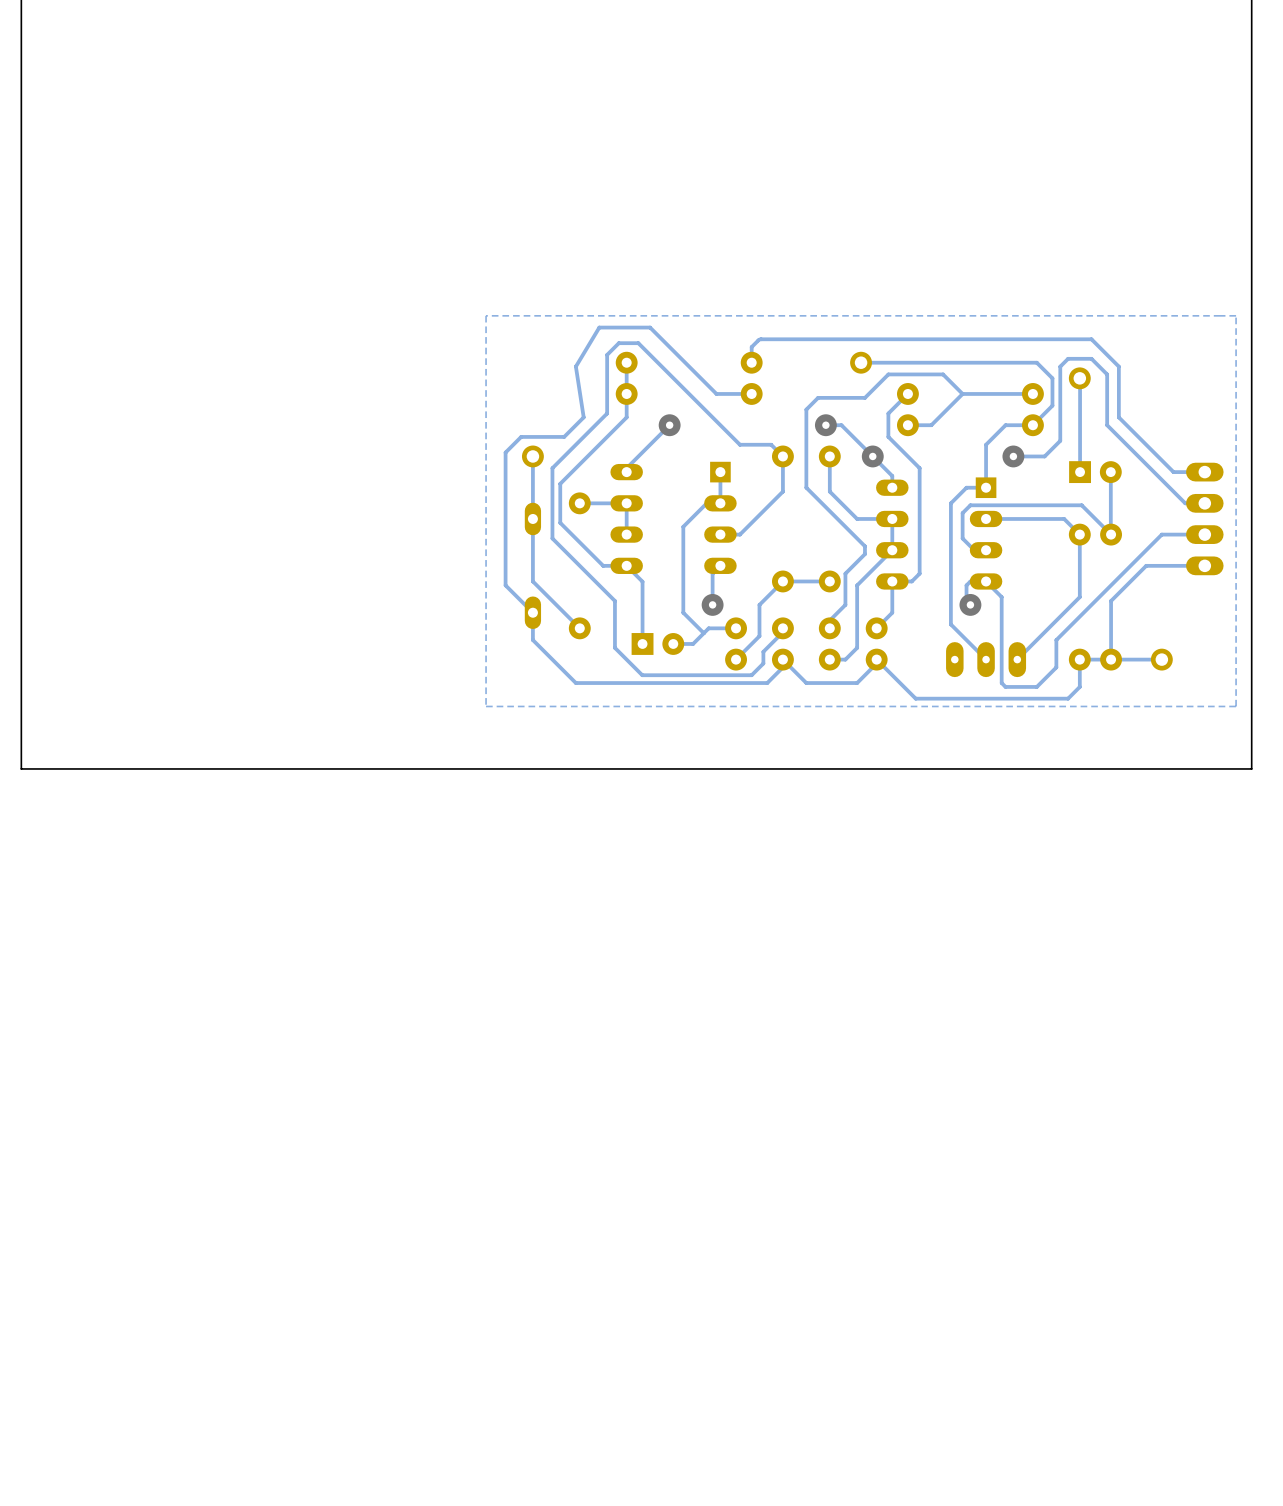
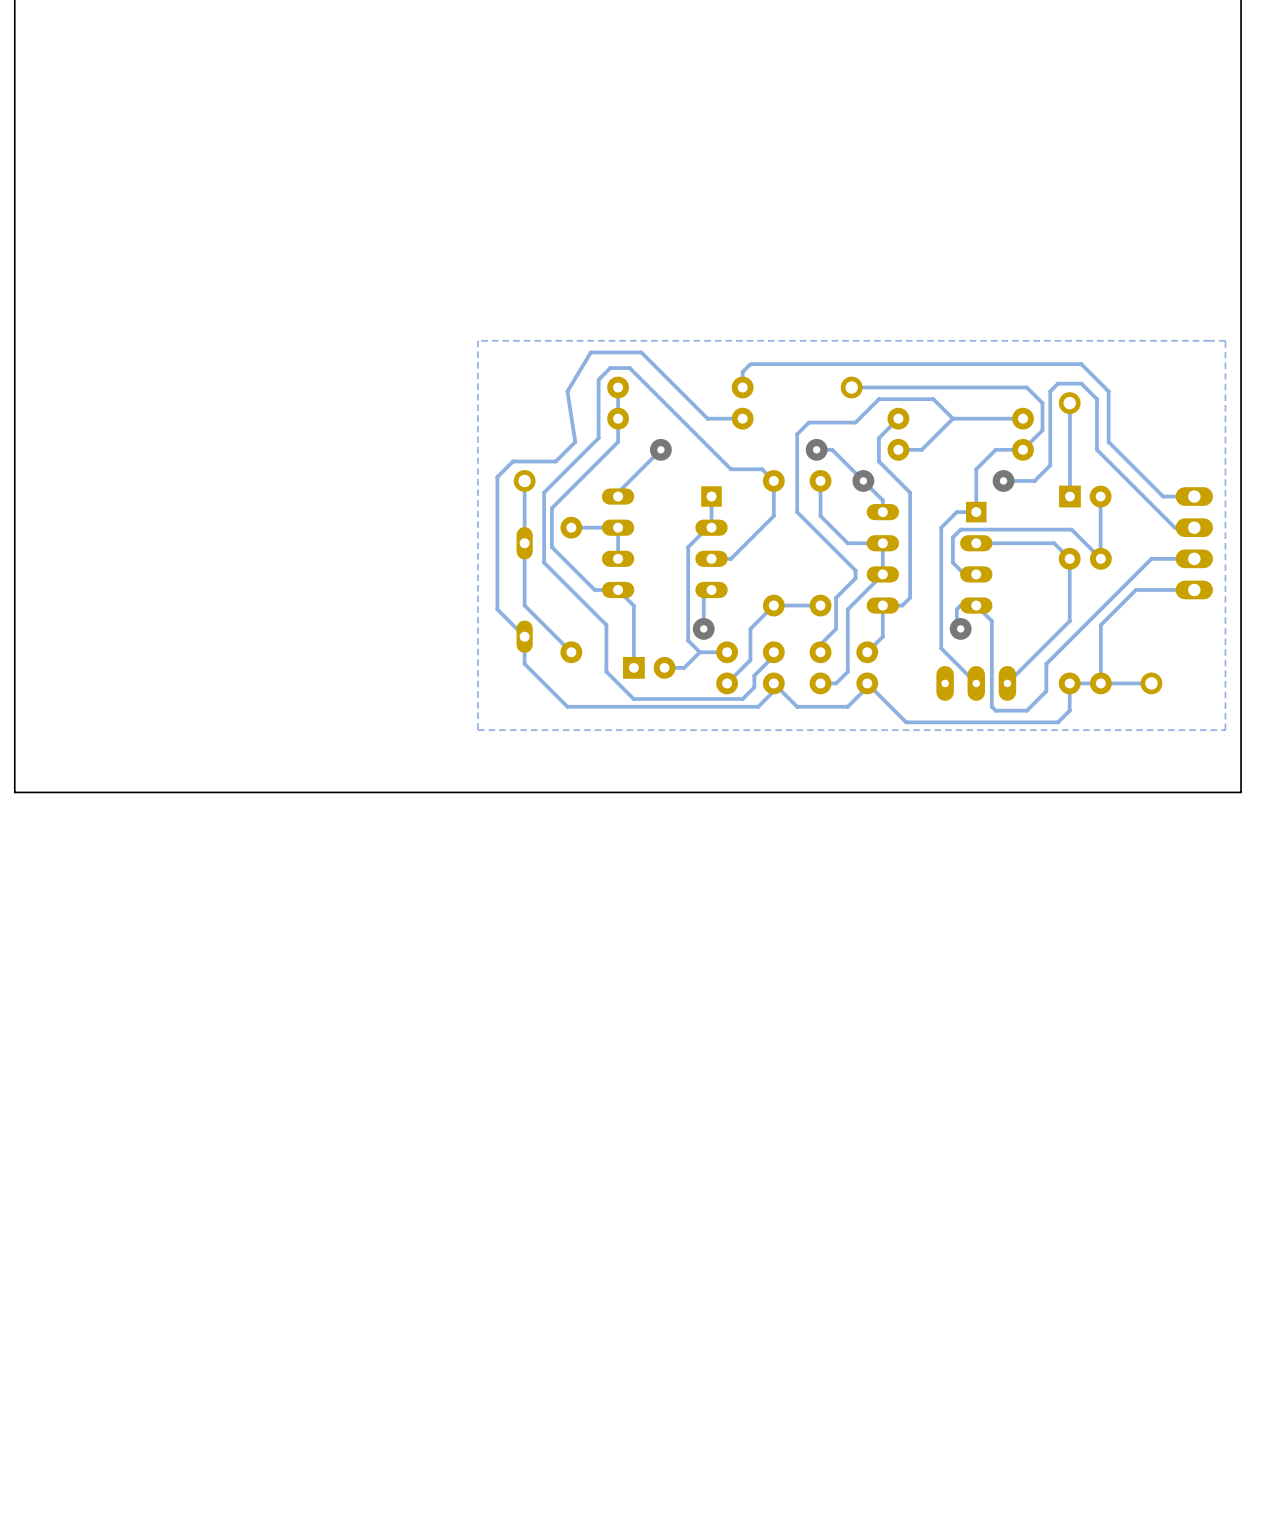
track: (716, 503) (706, 503) (683, 526) (683, 612) (703, 633) -> none
track: none -> (711, 527) (707, 527) (688, 547) (688, 640) (699, 652)

